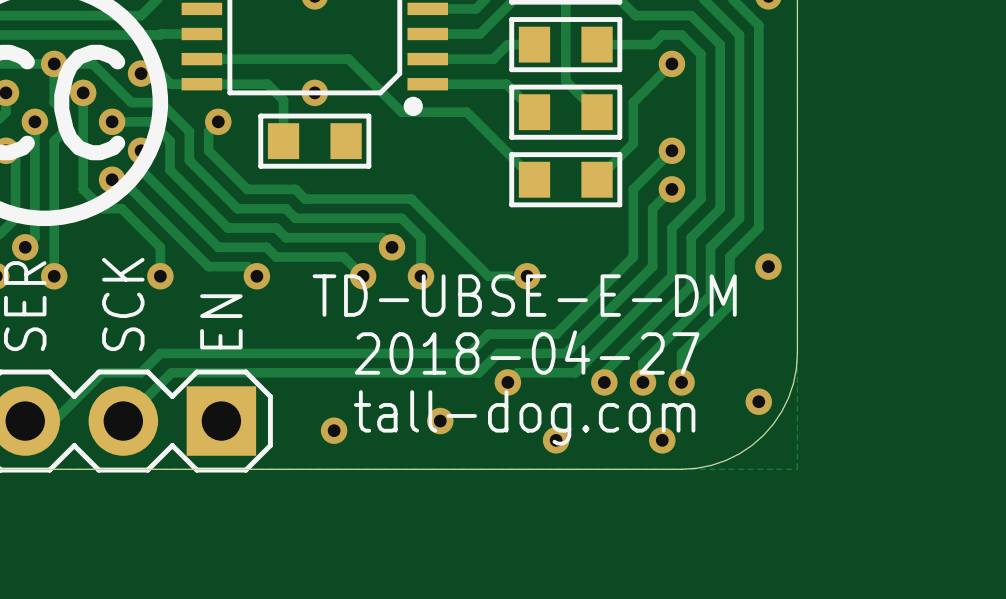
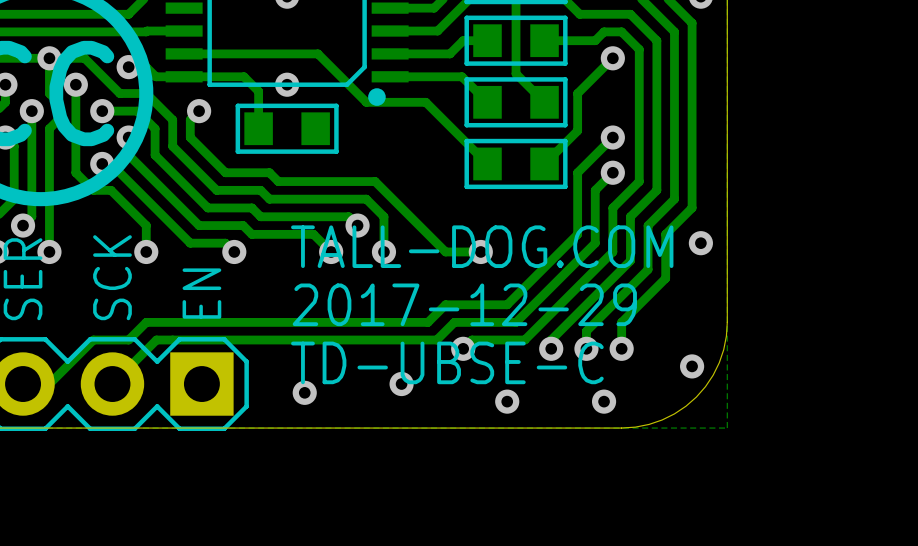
text: none -> TALL-DOG.COM (482, 246)
text: TD-UBSE-E-DM (524, 295) -> none
text: none -> 2017-12-29 (464, 304)
text: 2018-04-27 (527, 352) -> none
text: none -> TD-UBSE-C (447, 362)
text: tall-dog.com (524, 417) -> none

